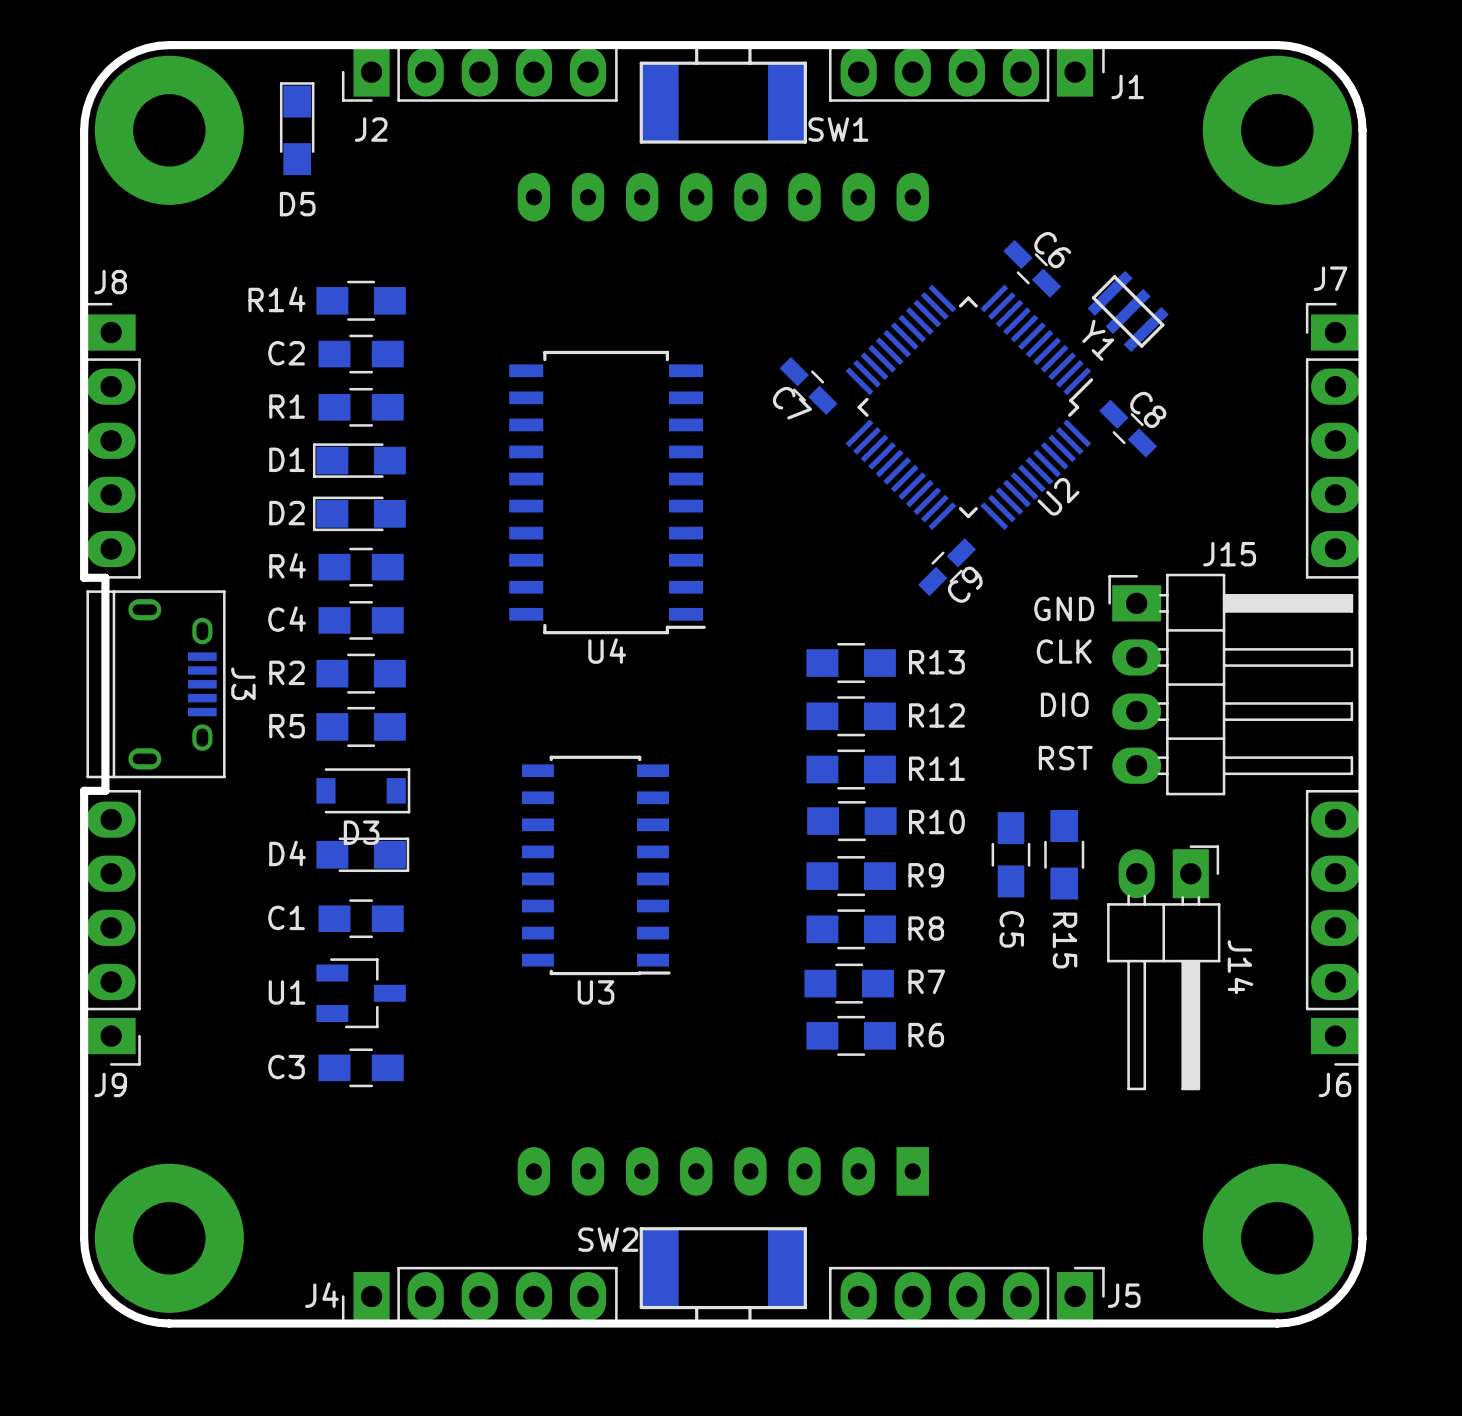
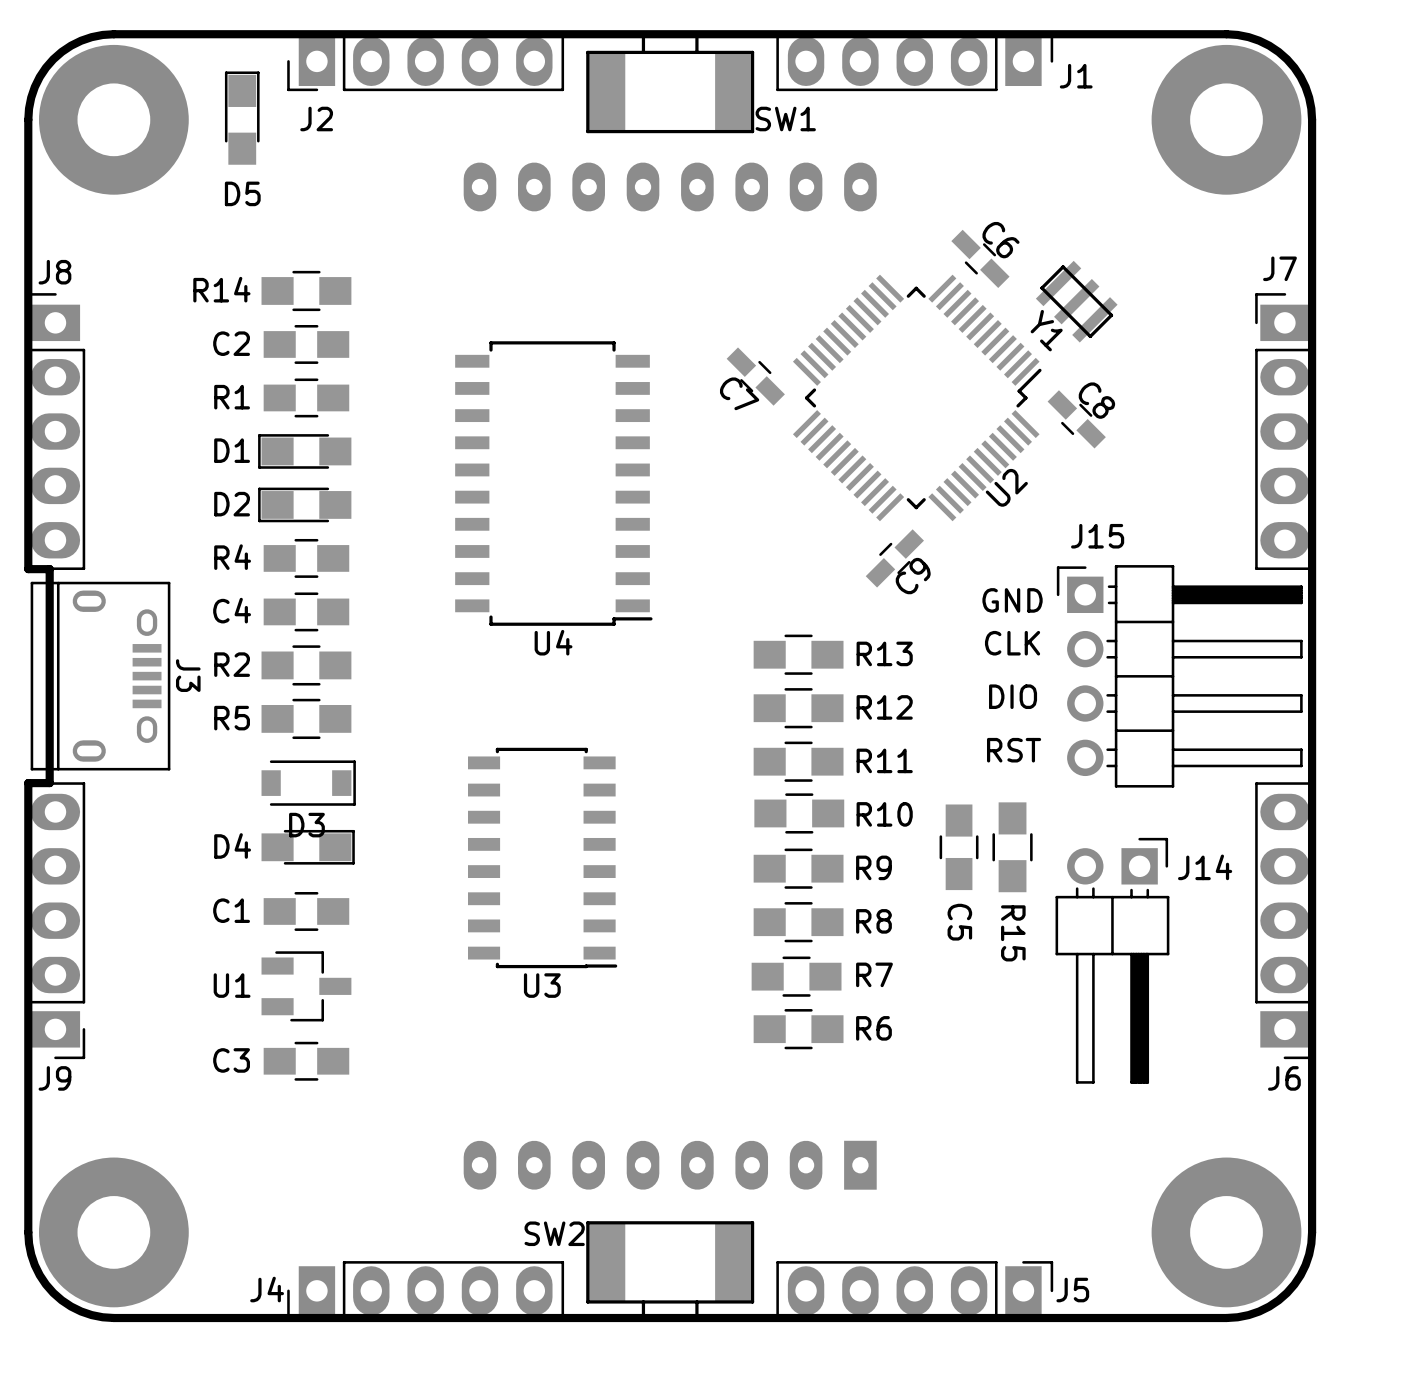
J15 name position: J15 (1229, 554) -> J15 (1097, 536)
J15 footprint: [1108, 573, 1354, 796] -> [1056, 565, 1303, 788]
J14 footprint: [1107, 845, 1221, 1091] -> [1055, 837, 1170, 1084]
J14 name position: J14 (1240, 967) -> J14 (1205, 867)

